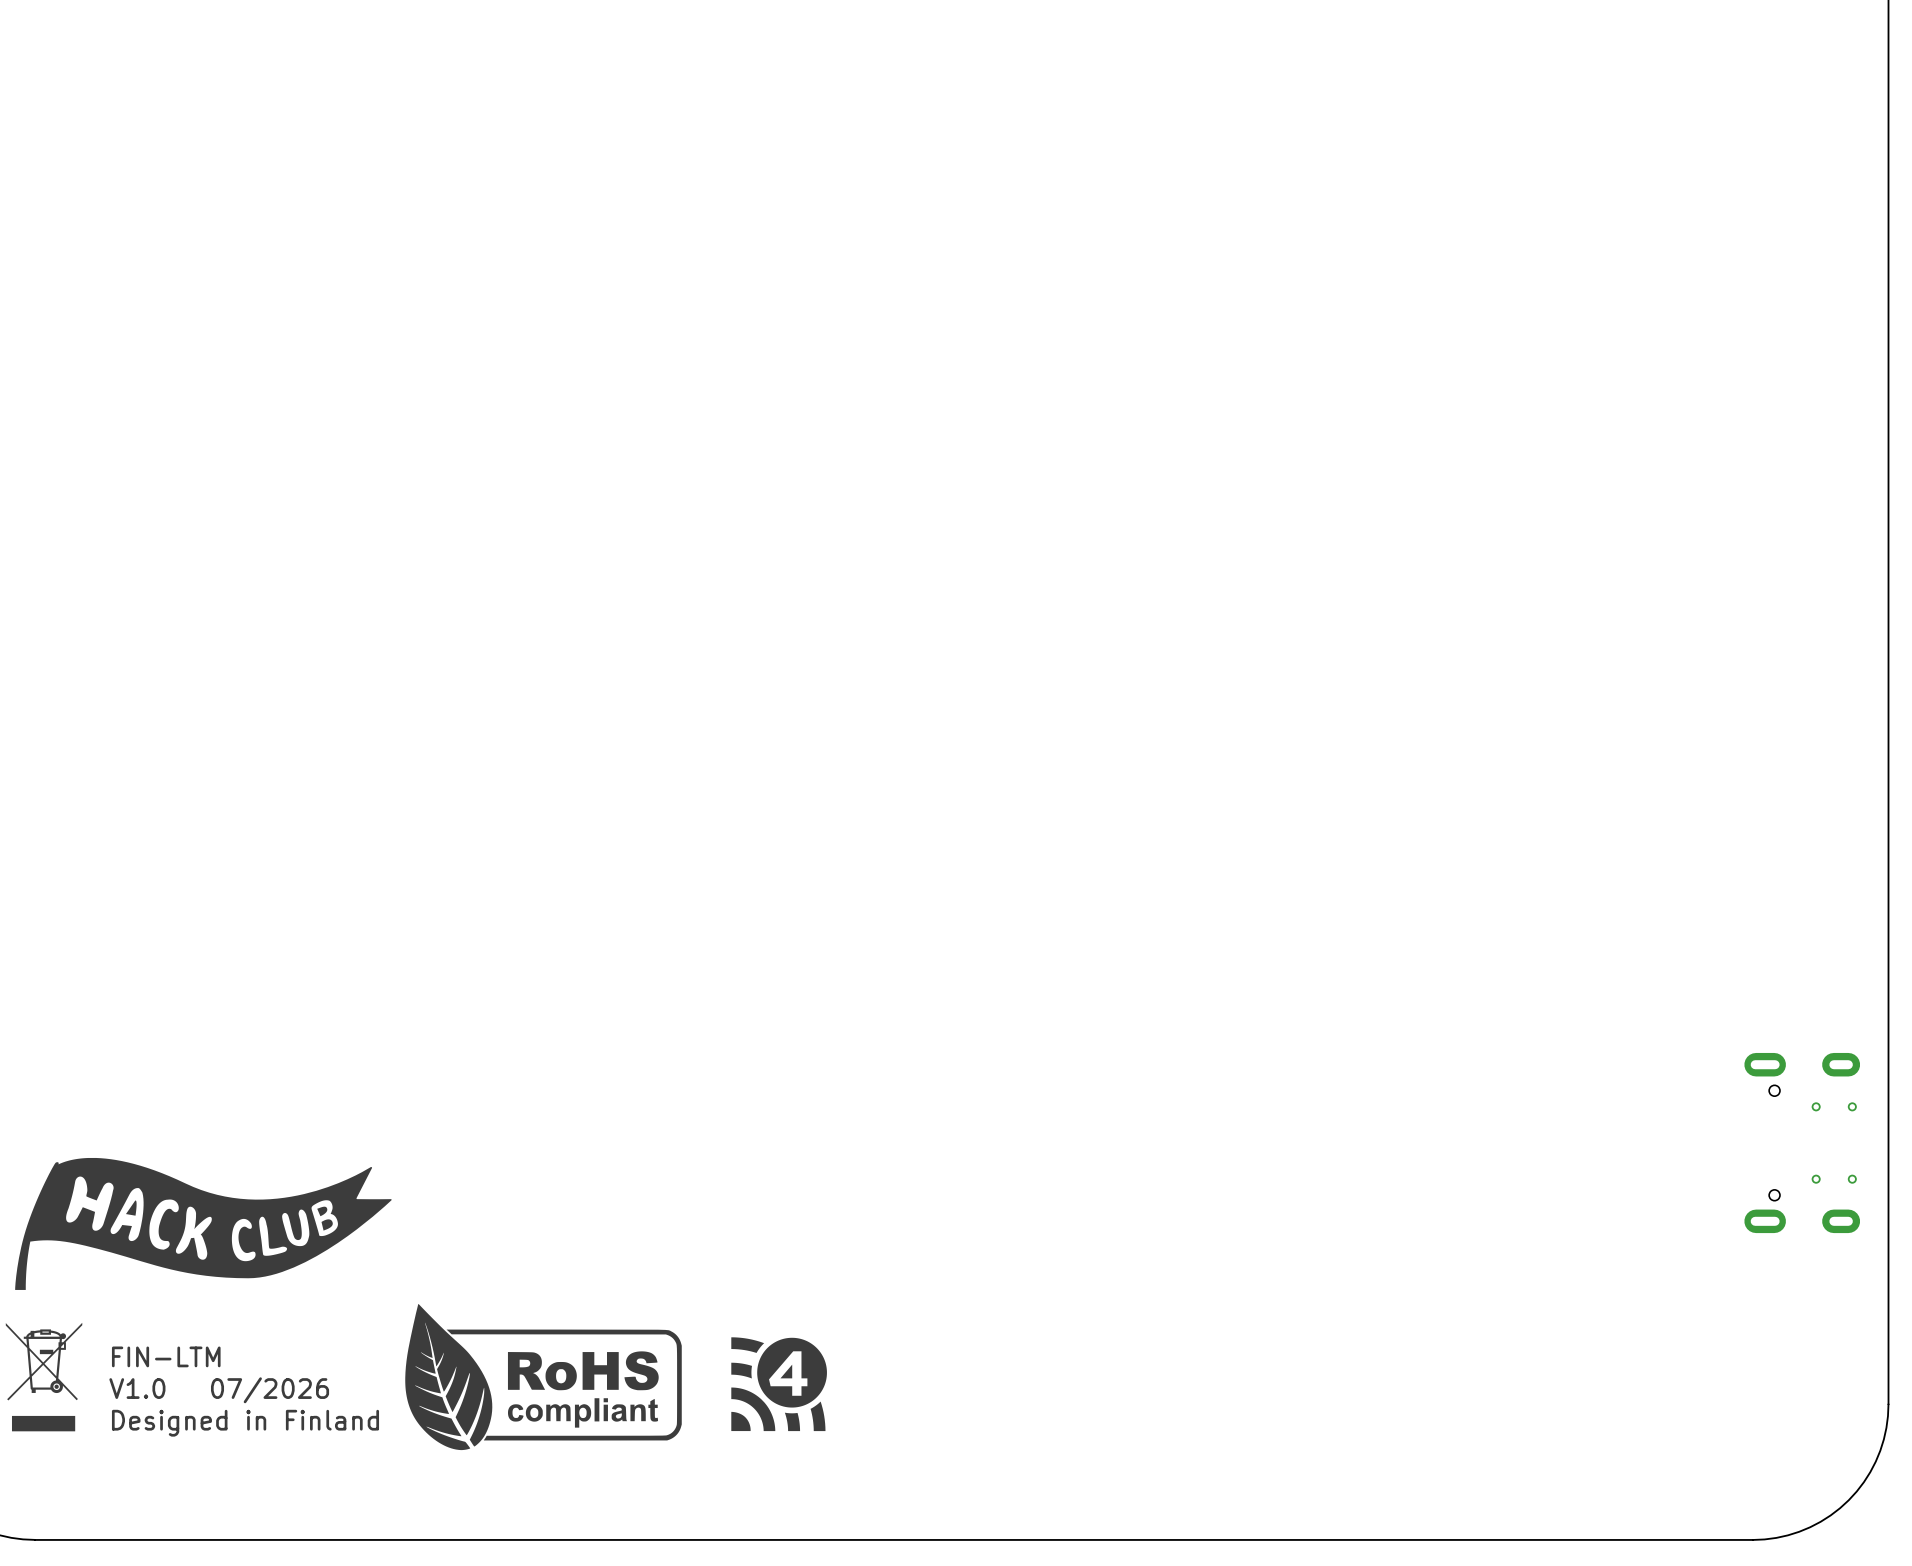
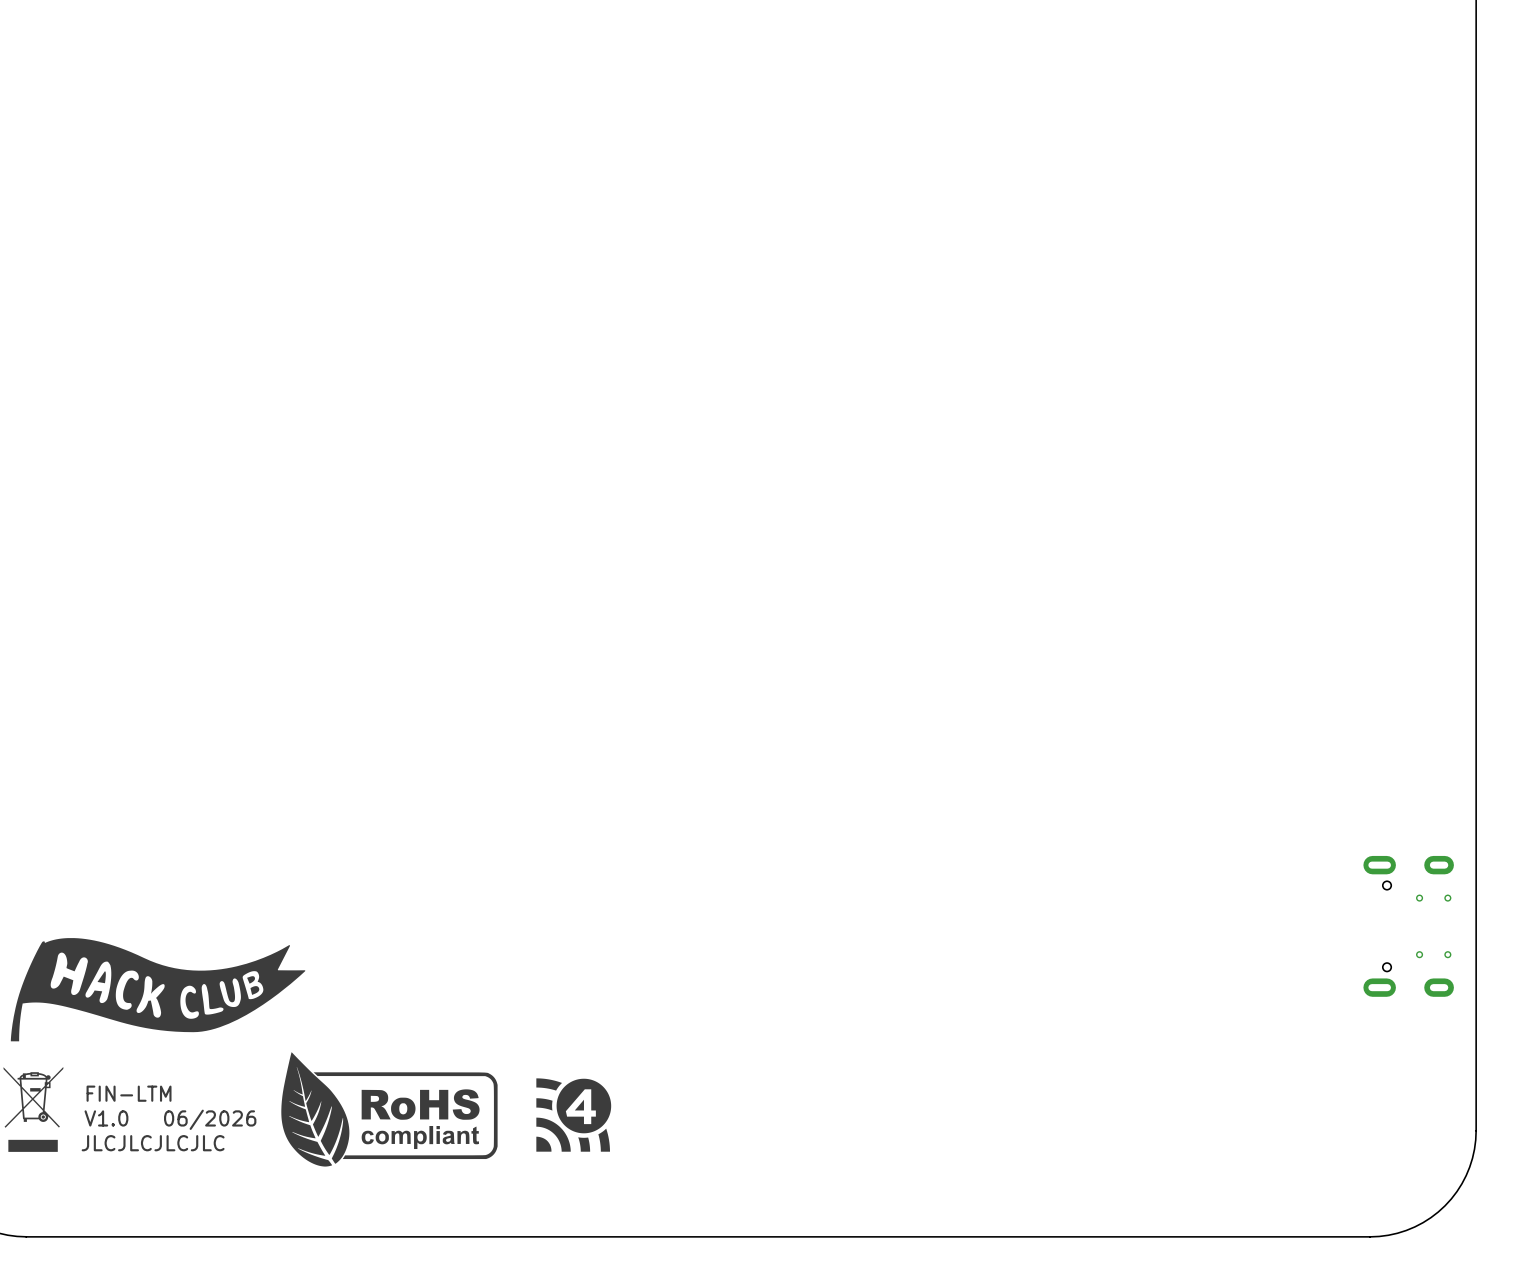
drawing: none -> [313, 1072, 498, 1160]
drawing: [446, 1329, 682, 1441] -> none
drawing position: (747, 1345) -> (549, 1084)
drawing position: (526, 1370) -> (376, 1104)
drawing position: (600, 1370) -> (434, 1104)
drawing position: (641, 1370) -> (466, 1104)
drawing position: (741, 1370) -> (544, 1104)
drawing position: (786, 1371) -> (579, 1105)
drawing position: (792, 1372) -> (583, 1106)
drawing position: (561, 1376) -> (403, 1108)
drawing position: (448, 1377) -> (315, 1109)
text: V1.0 07/2026 (219, 1390) -> V1.0 06/2026 (170, 1119)
drawing position: (605, 1400) -> (438, 1127)
drawing position: (596, 1409) -> (431, 1135)
drawing position: (753, 1409) -> (553, 1134)
drawing position: (653, 1410) -> (475, 1135)
drawing position: (515, 1412) -> (367, 1137)
drawing position: (534, 1412) -> (382, 1137)
drawing position: (558, 1412) -> (401, 1137)
drawing position: (605, 1412) -> (438, 1137)
drawing position: (619, 1412) -> (448, 1137)
drawing position: (638, 1412) -> (463, 1137)
drawing position: (583, 1415) -> (420, 1139)
drawing position: (818, 1416) -> (604, 1140)
drawing position: (740, 1421) -> (543, 1144)
drawing position: (792, 1421) -> (584, 1144)
text: Designed in Finland (245, 1423) -> JLCJLCJLCJLC (153, 1143)

